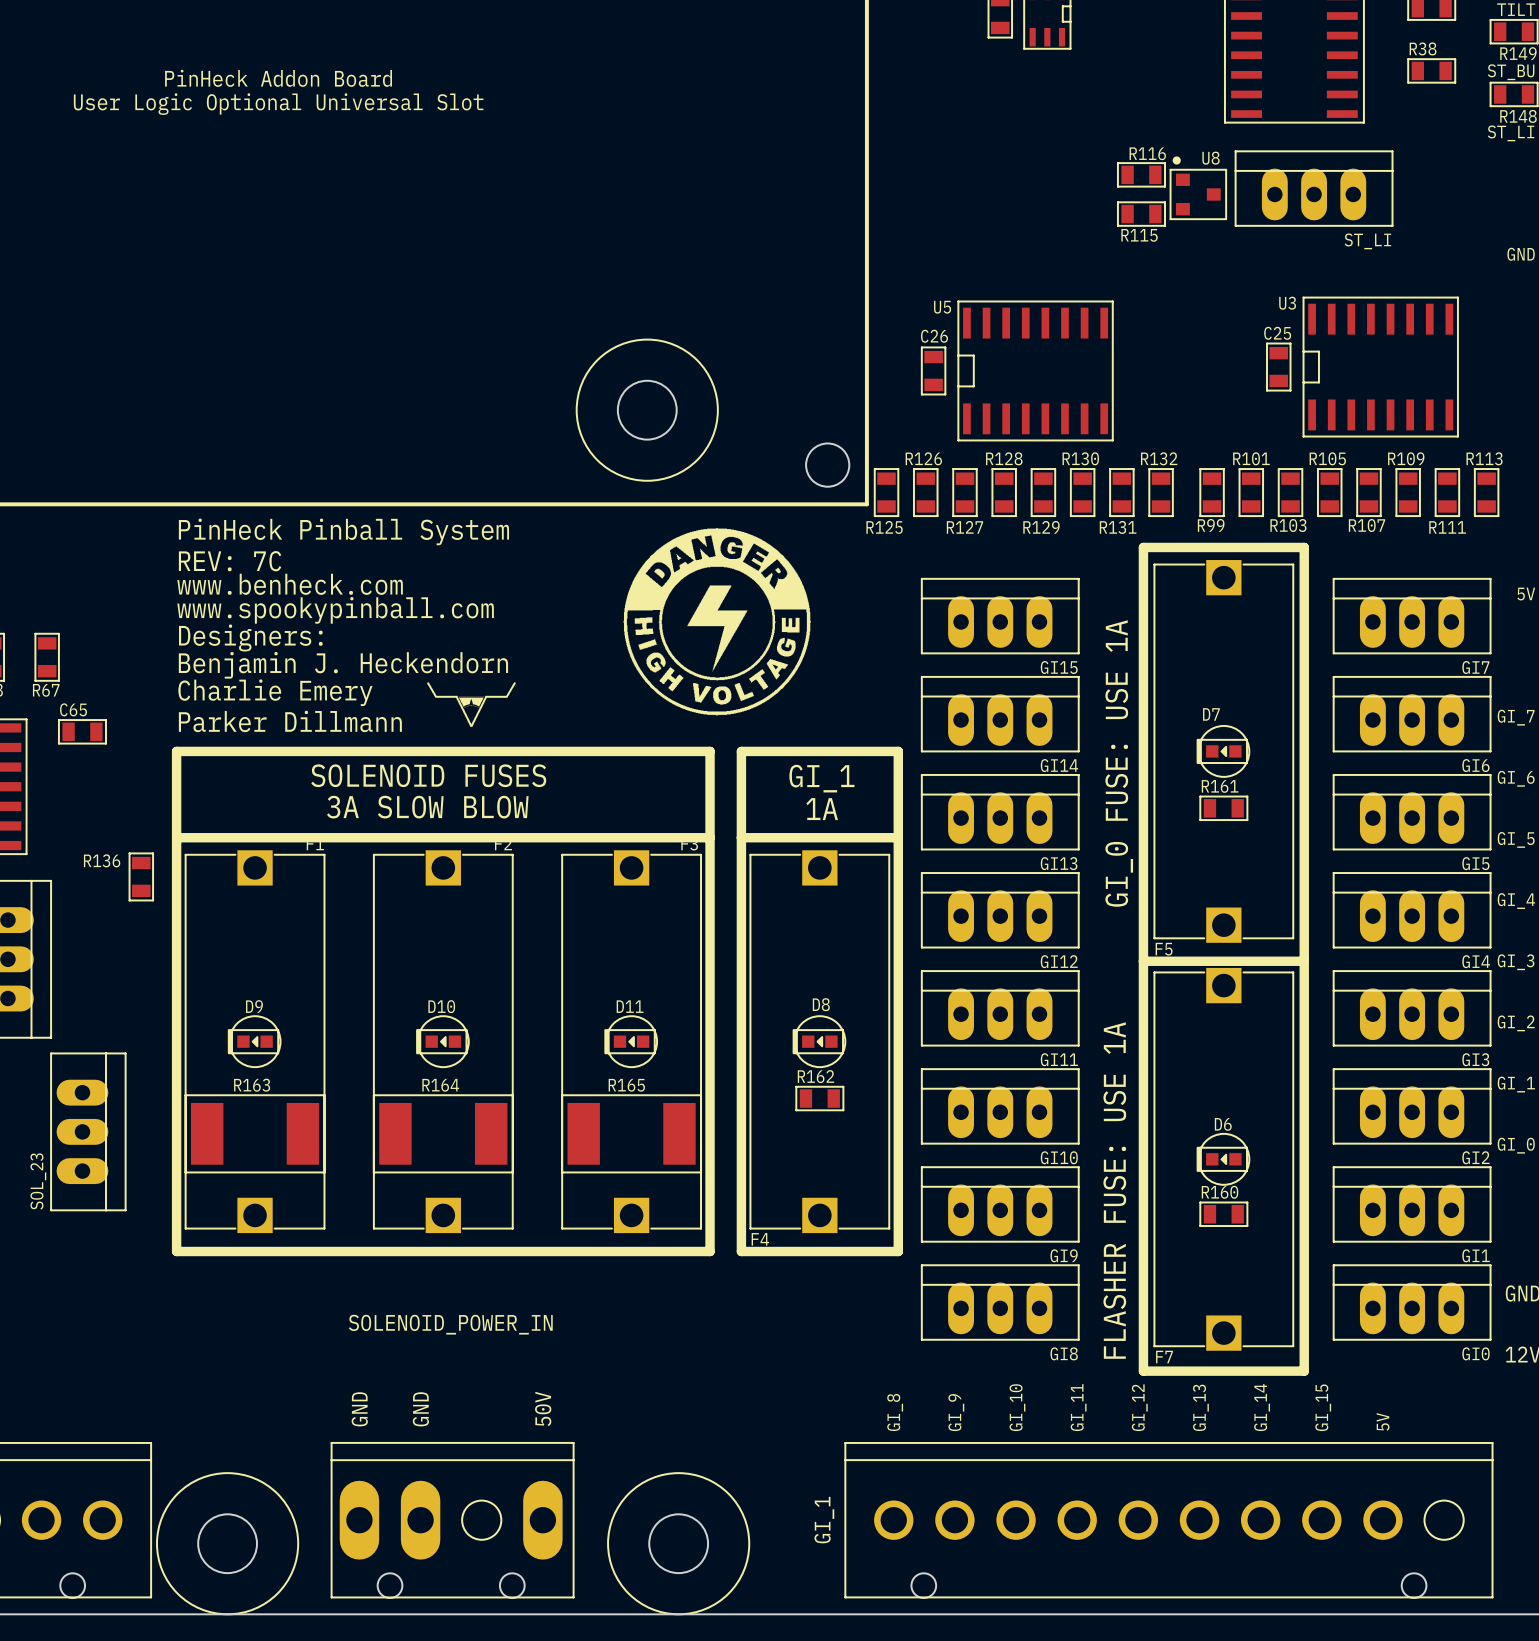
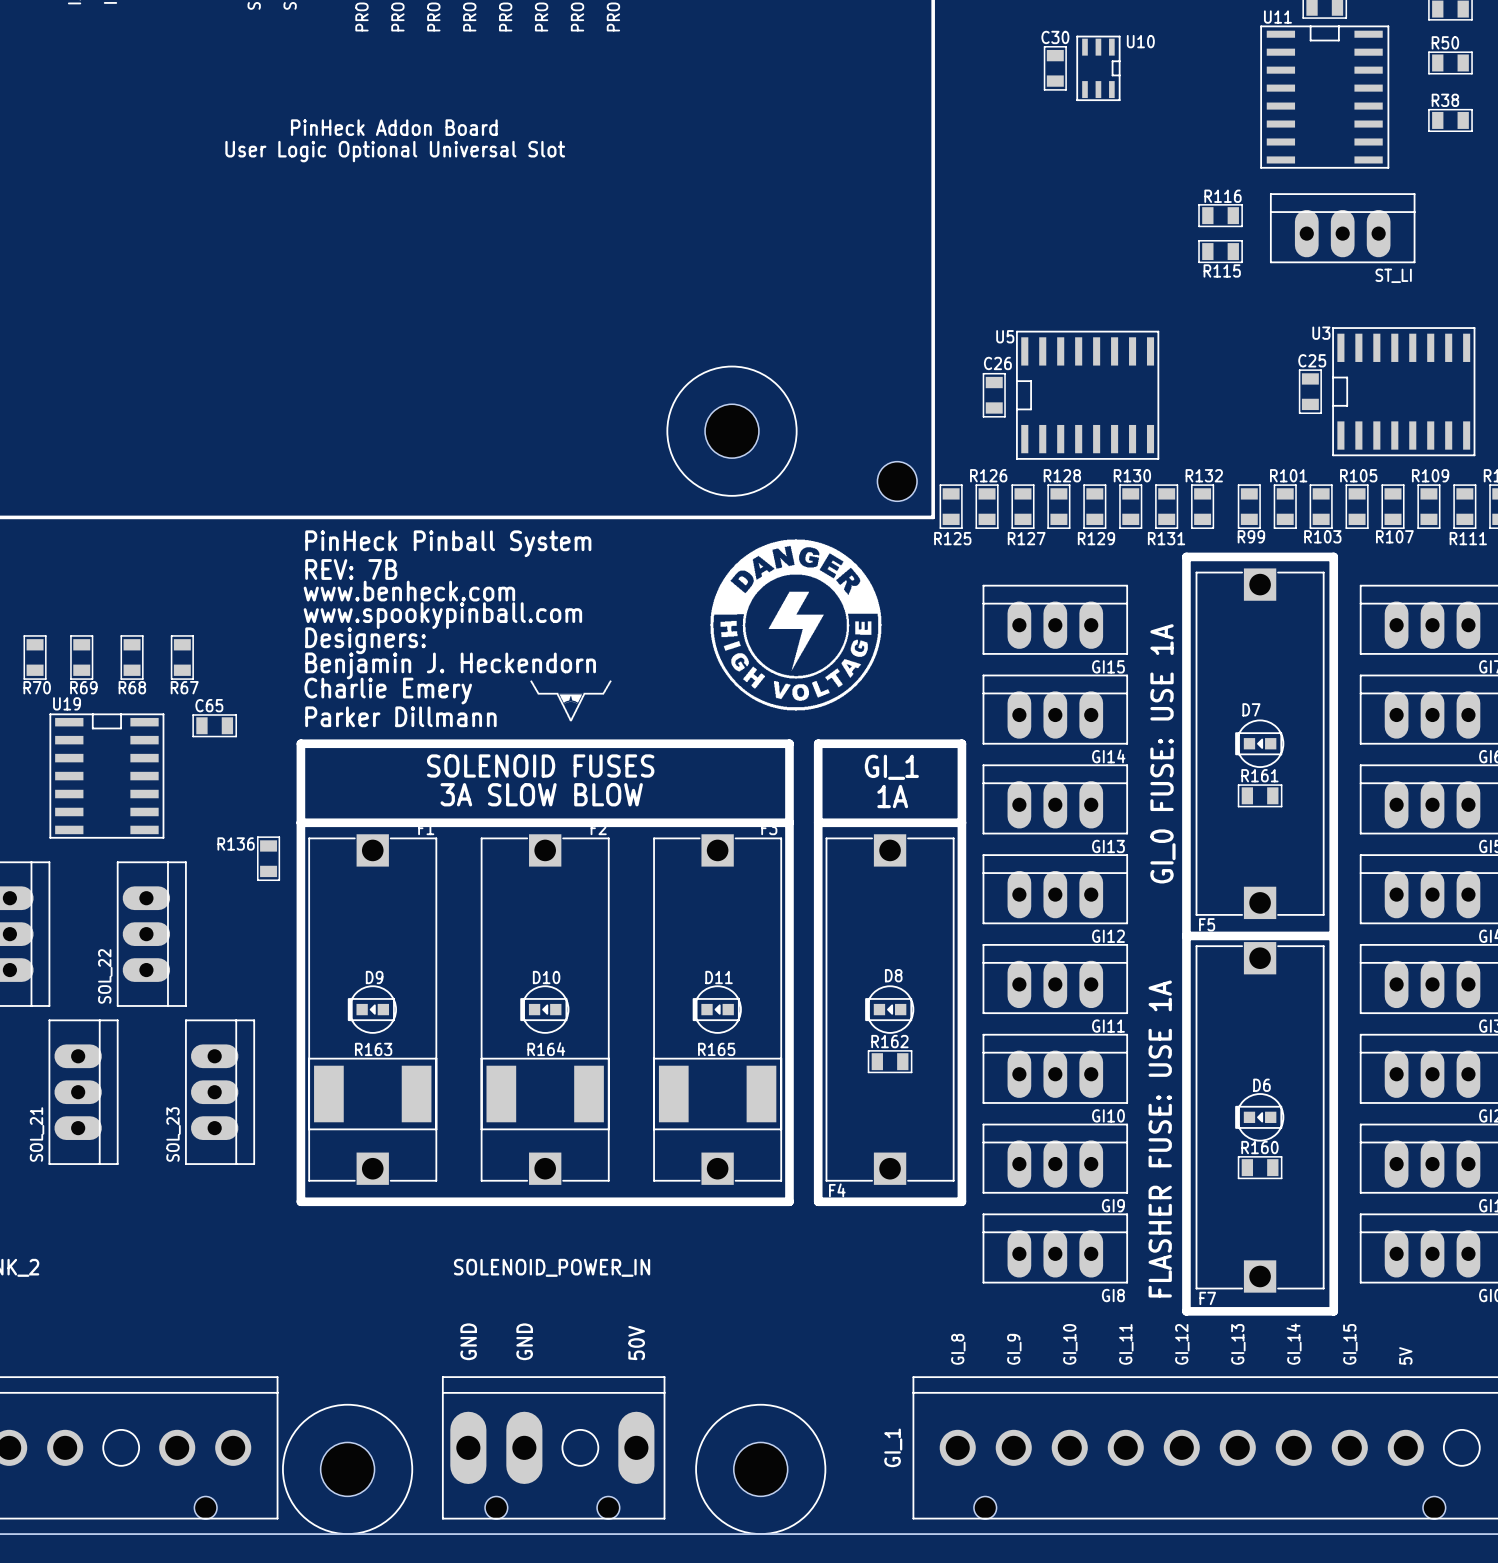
R116 position: (1141, 174) -> (1220, 215)
U8: (1198, 188) -> none
R115 position: (1141, 214) -> (1220, 251)
text: REV: 7C (230, 561) -> REV: 7B (351, 569)

